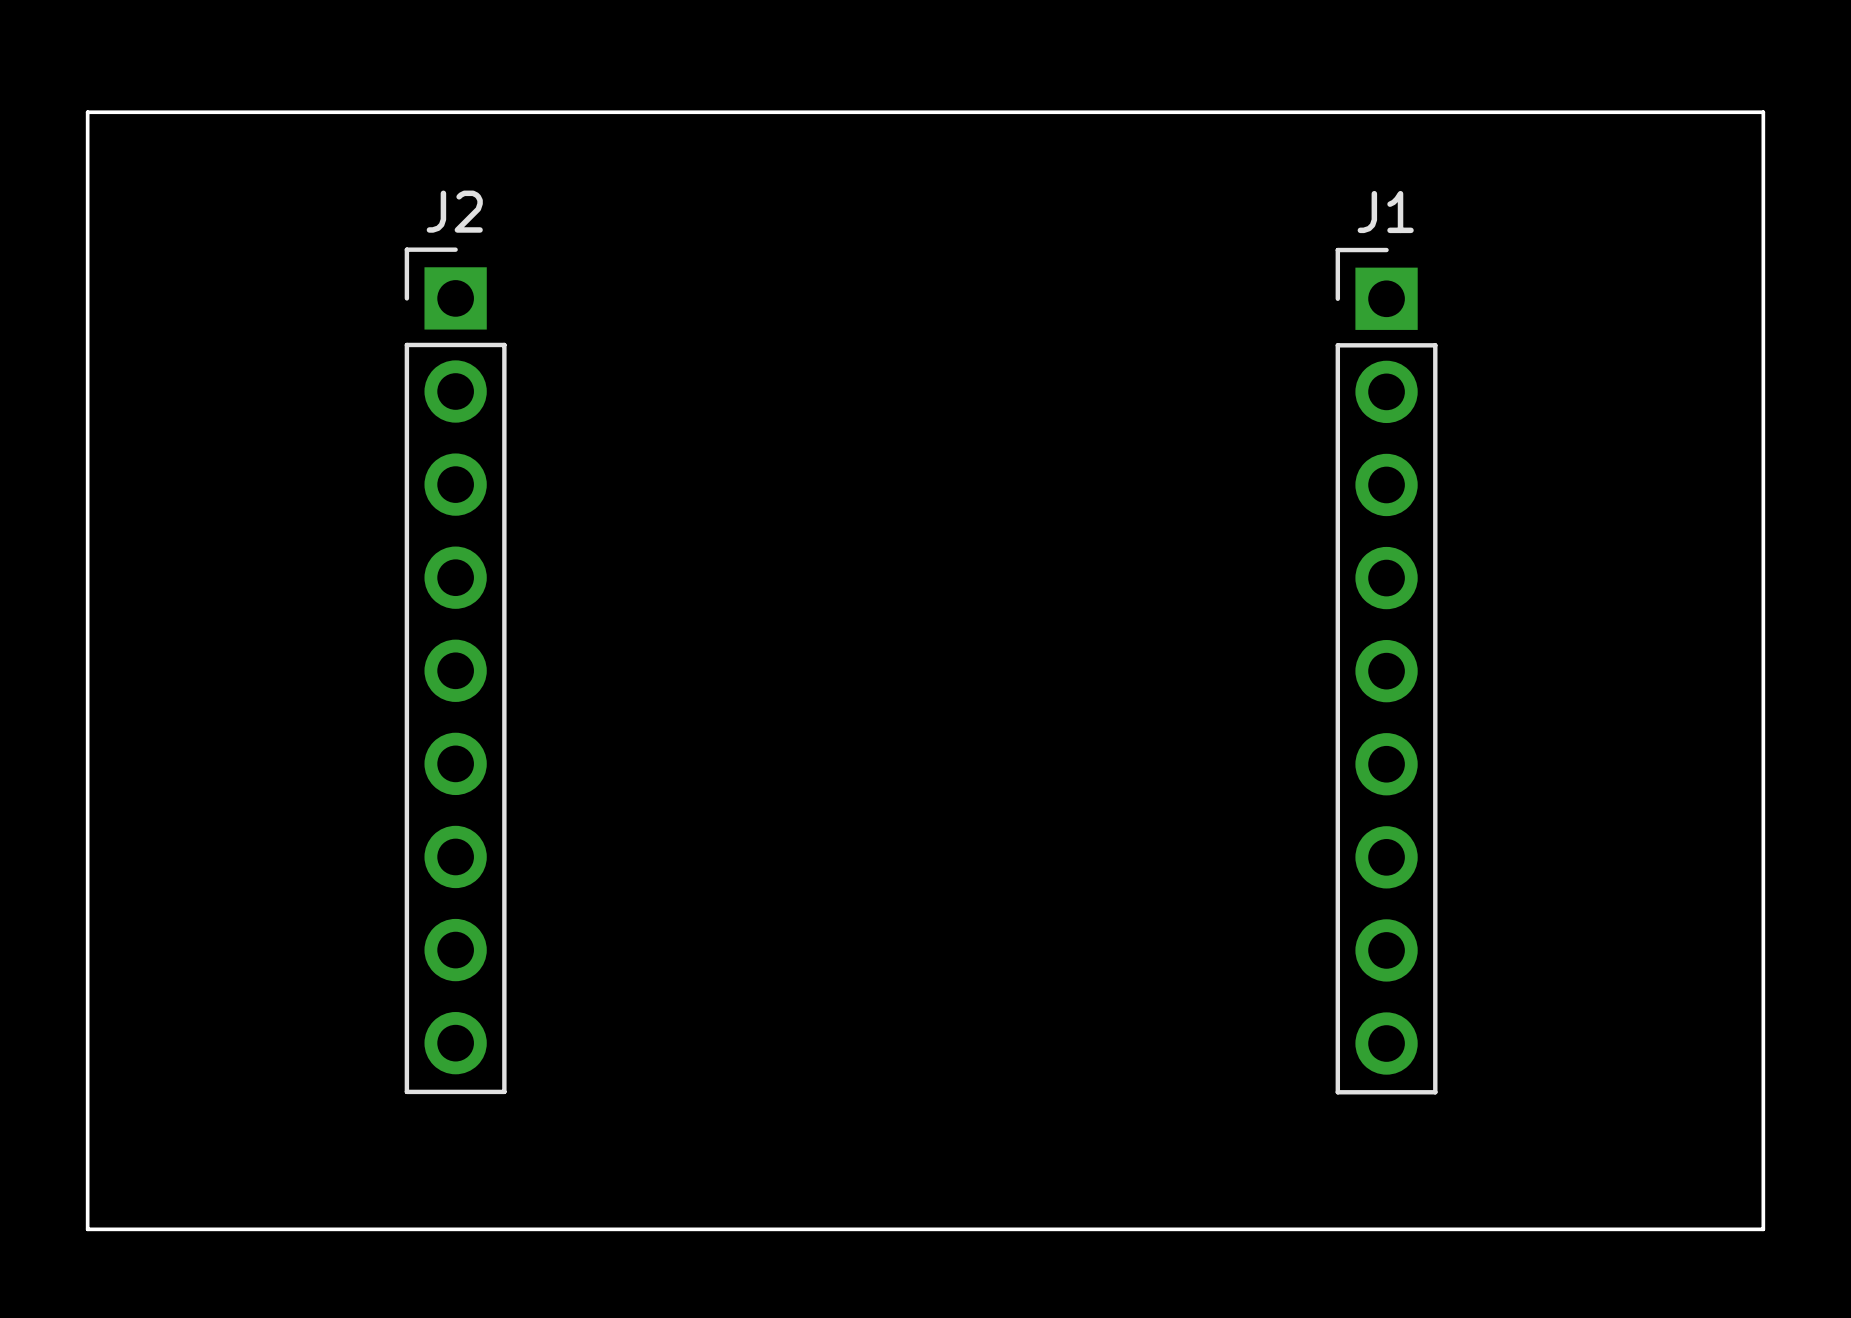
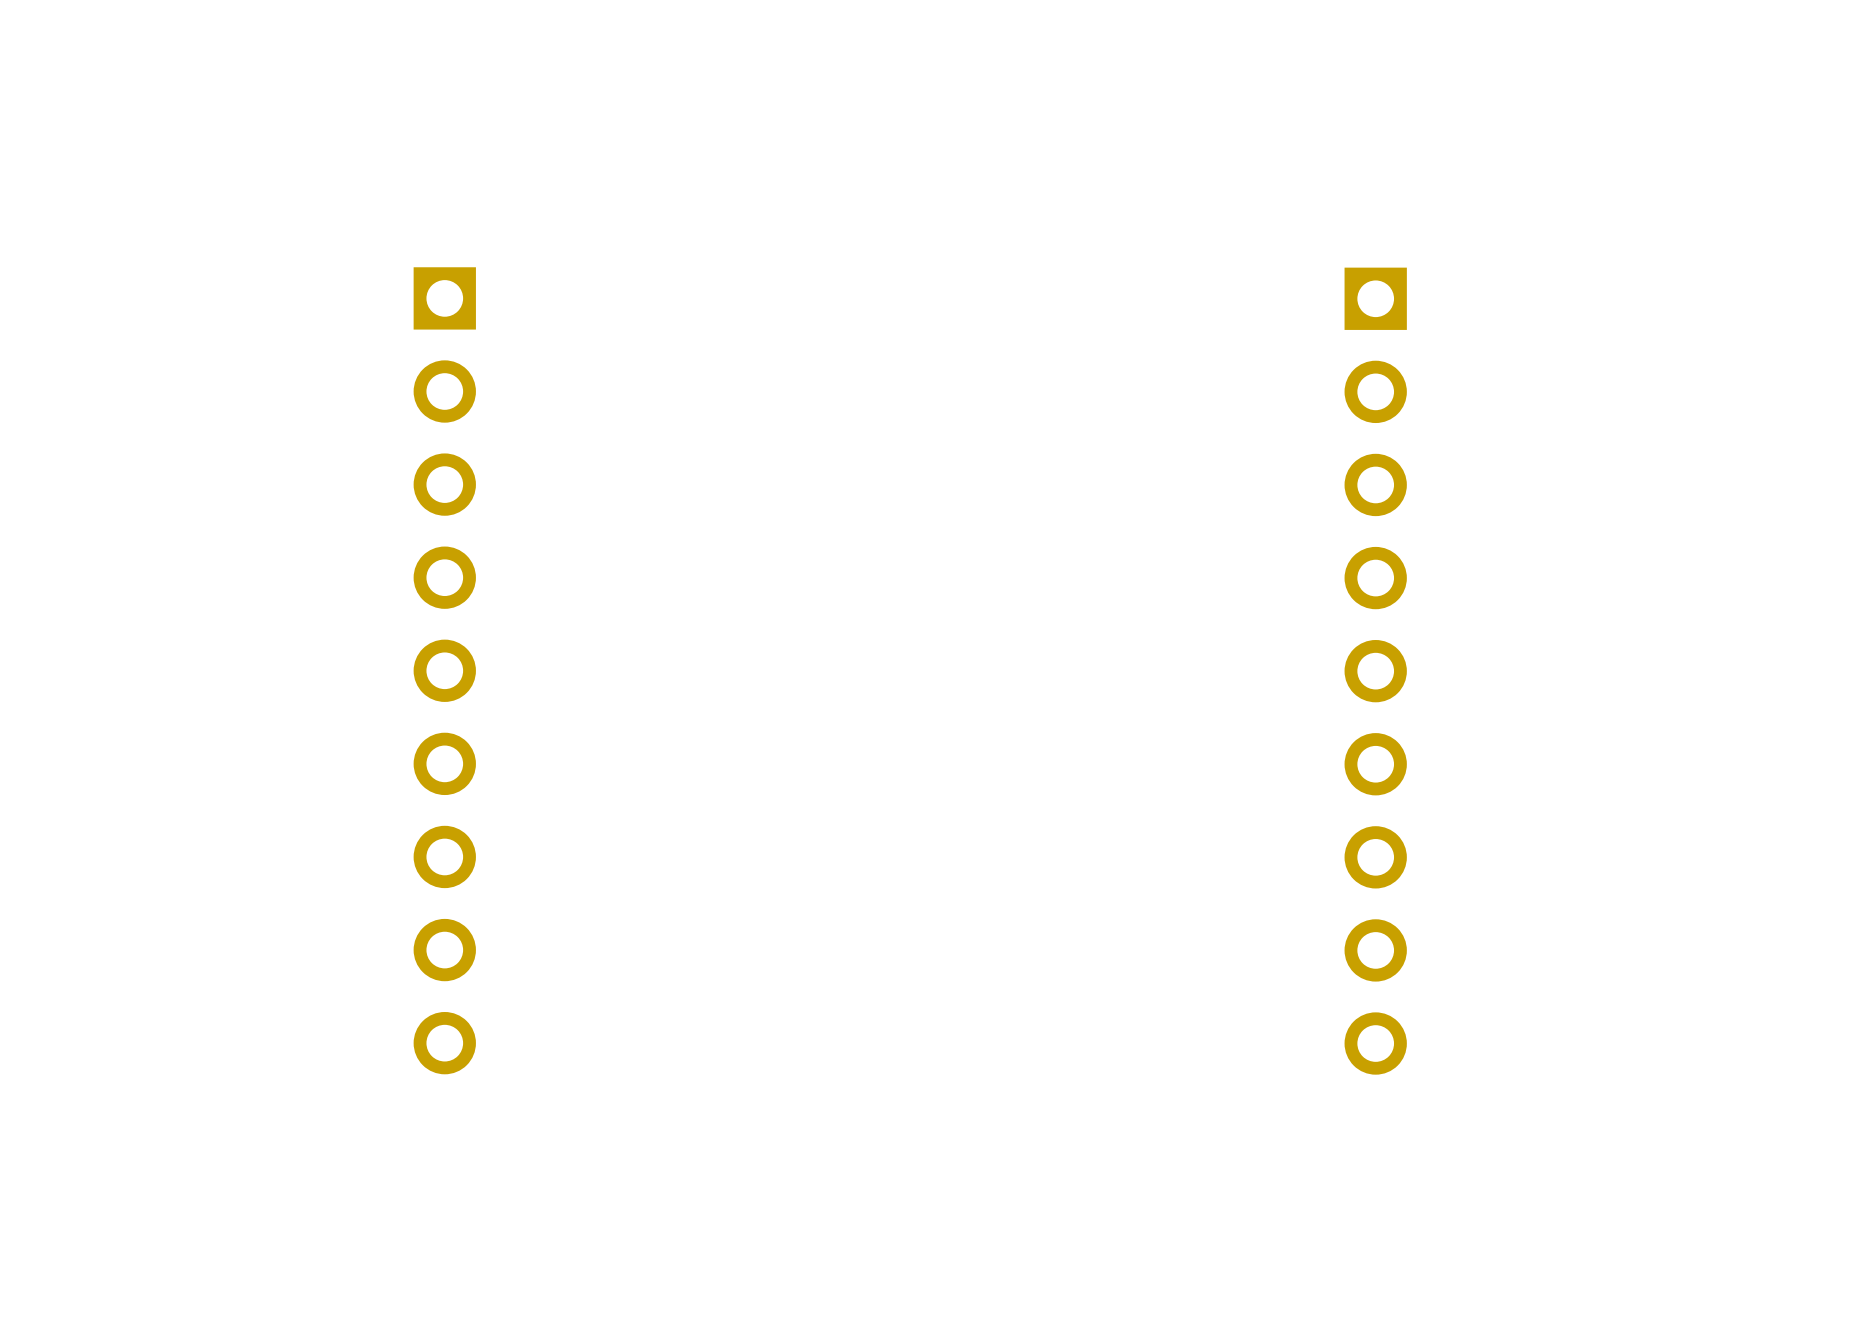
board edge: (1763, 112) (87, 112) (87, 1229) (1763, 1229) (1763, 112) -> none
J2 side: bottom (455, 670) -> top (444, 670)
J1 side: bottom (1386, 671) -> top (1375, 671)

